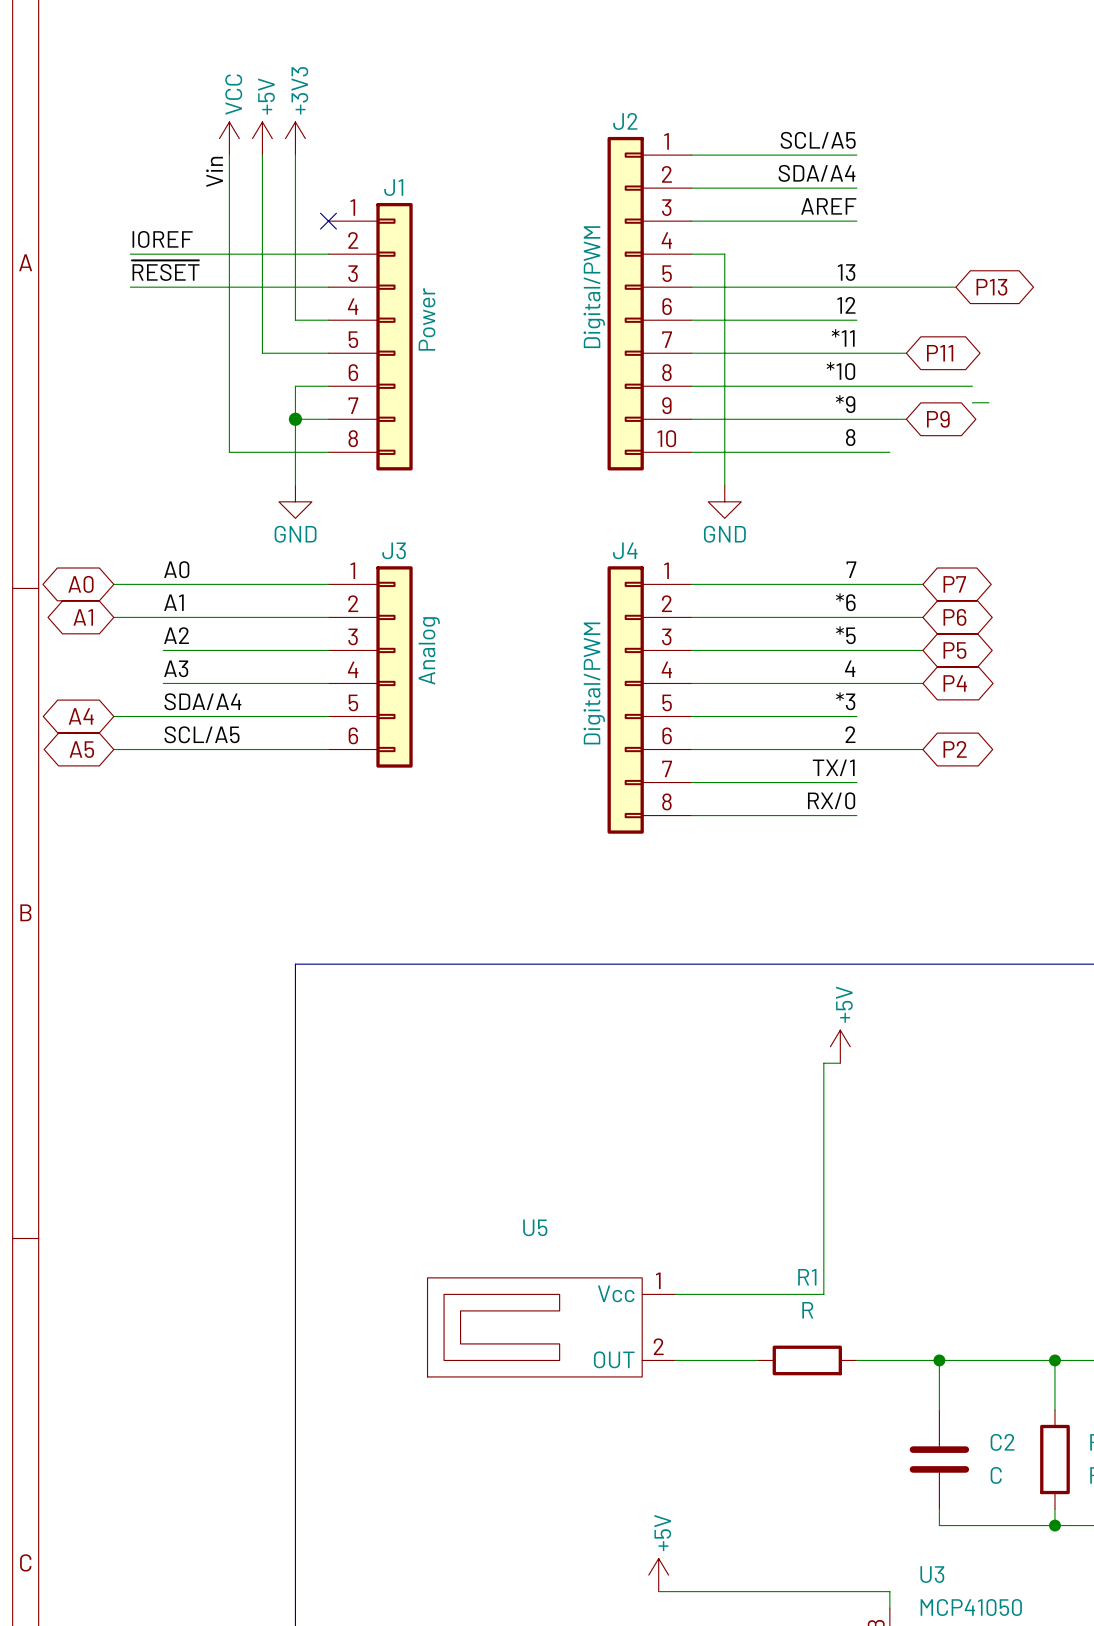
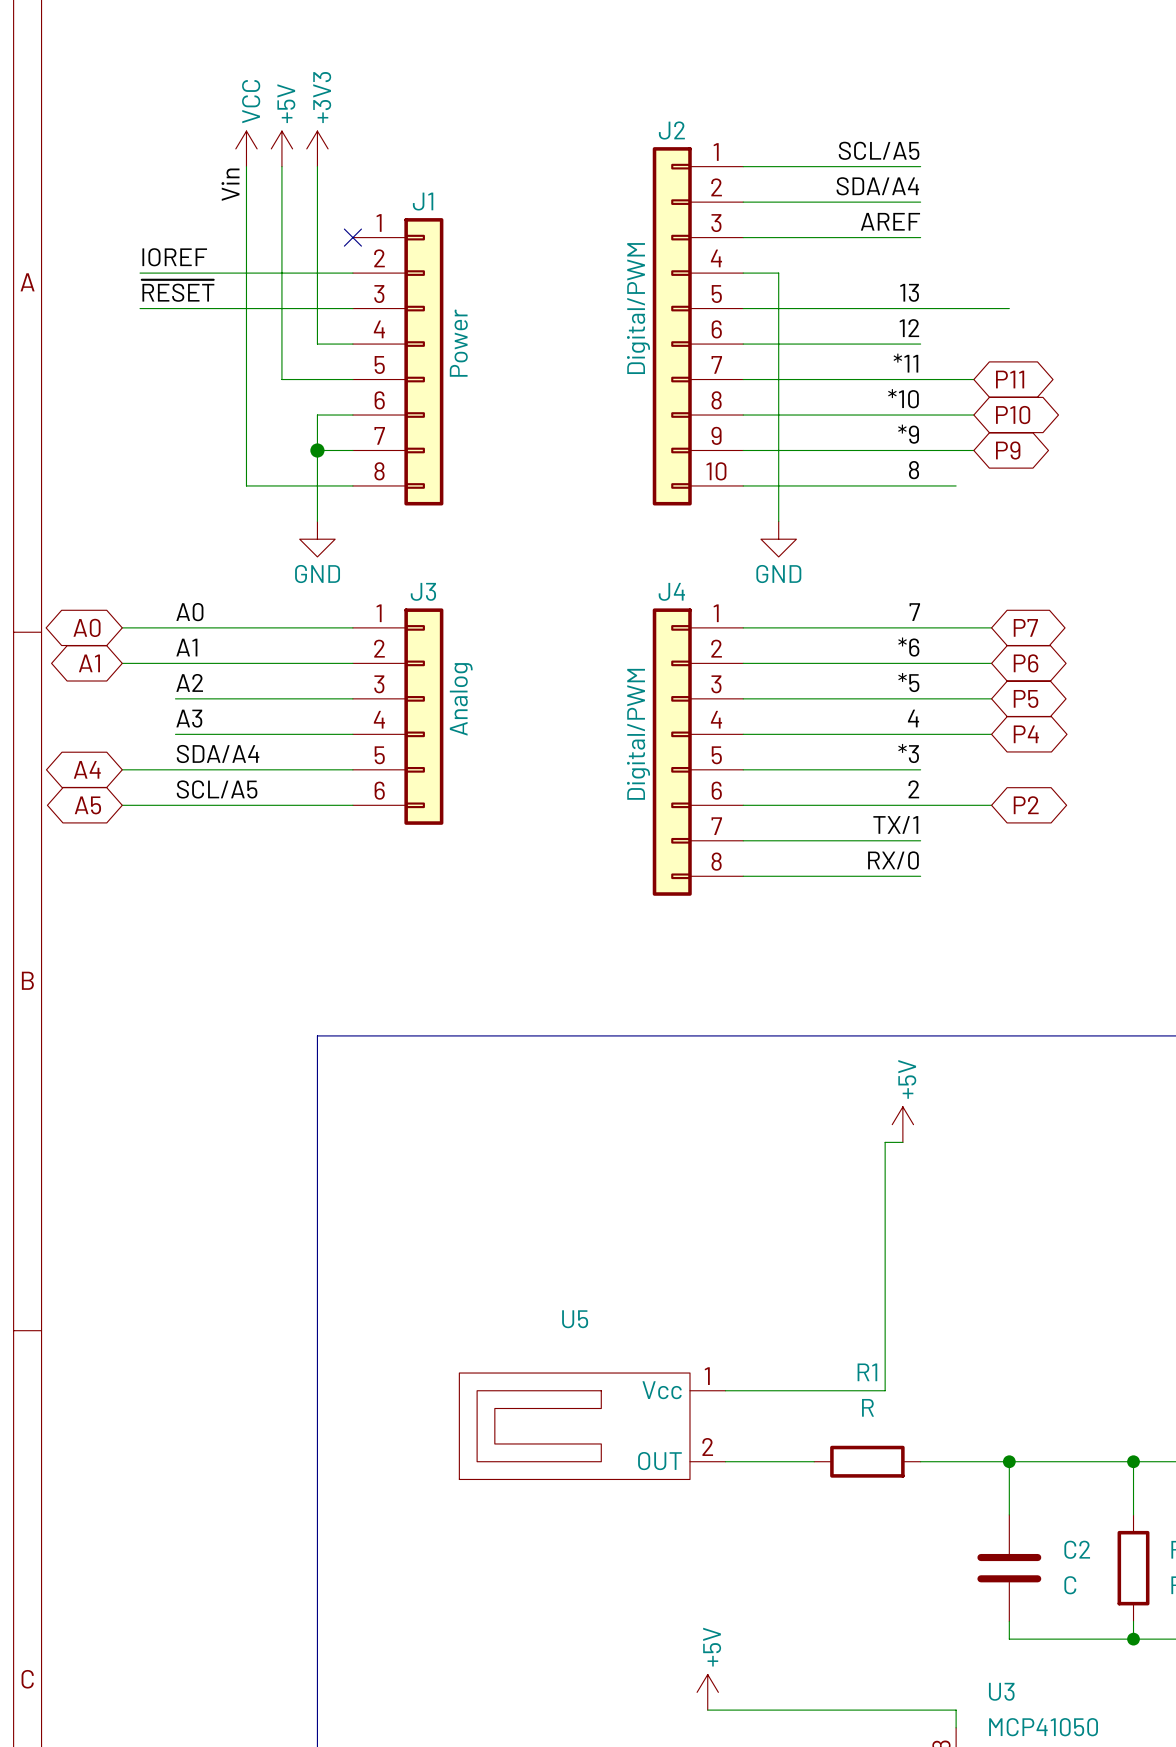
wire: (939, 287) (955, 287) -> none
global label: P13 (991, 287) -> none
wire: (906, 386) (972, 386) -> none
global label: none -> P10 (1013, 415)
wire: (972, 402) (988, 402) -> none

